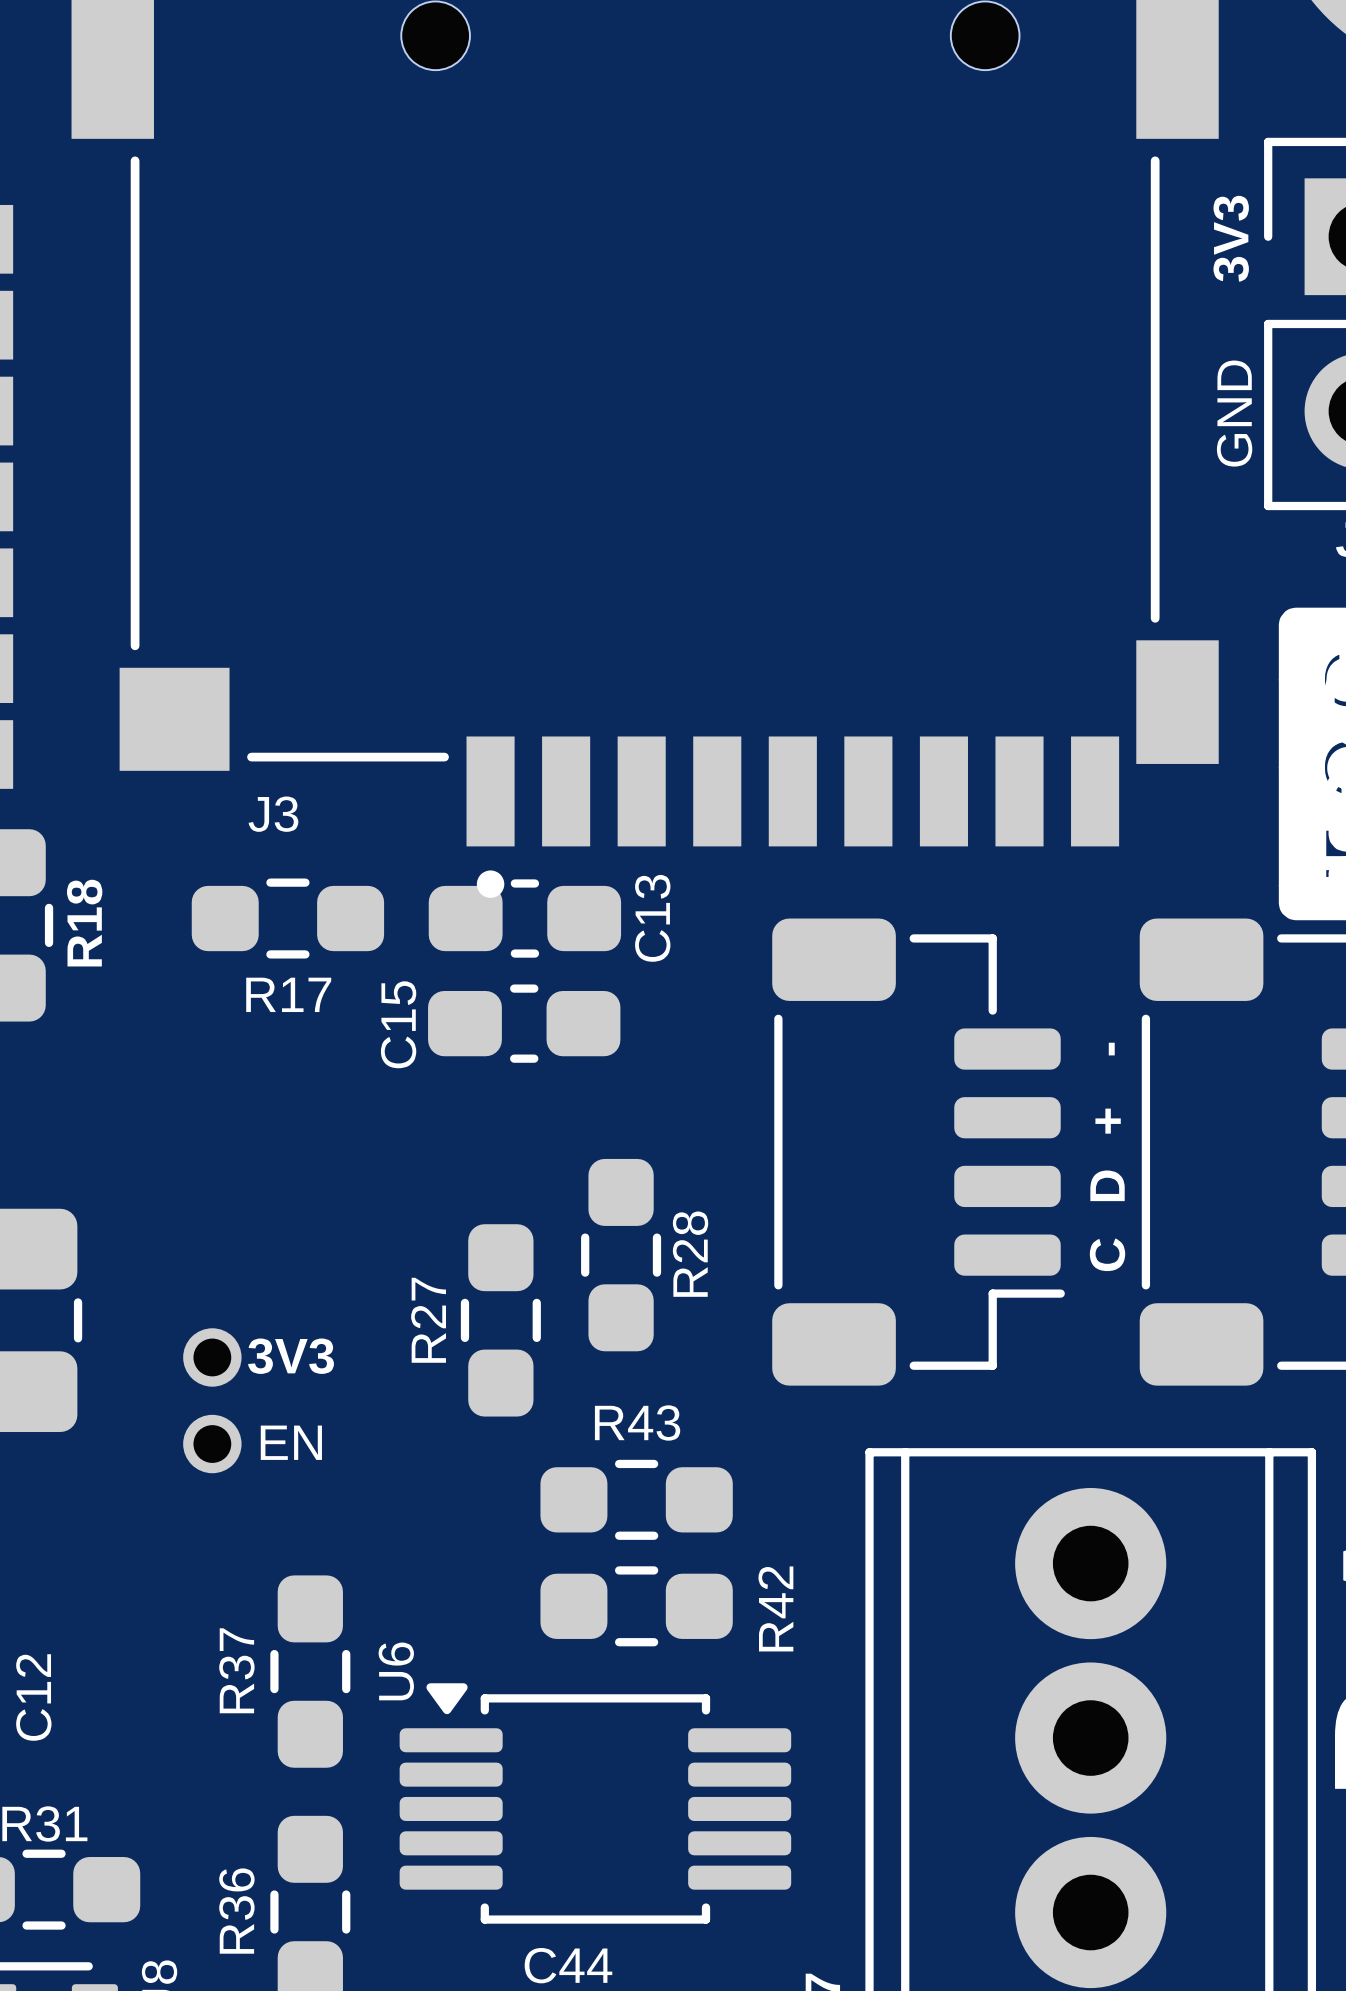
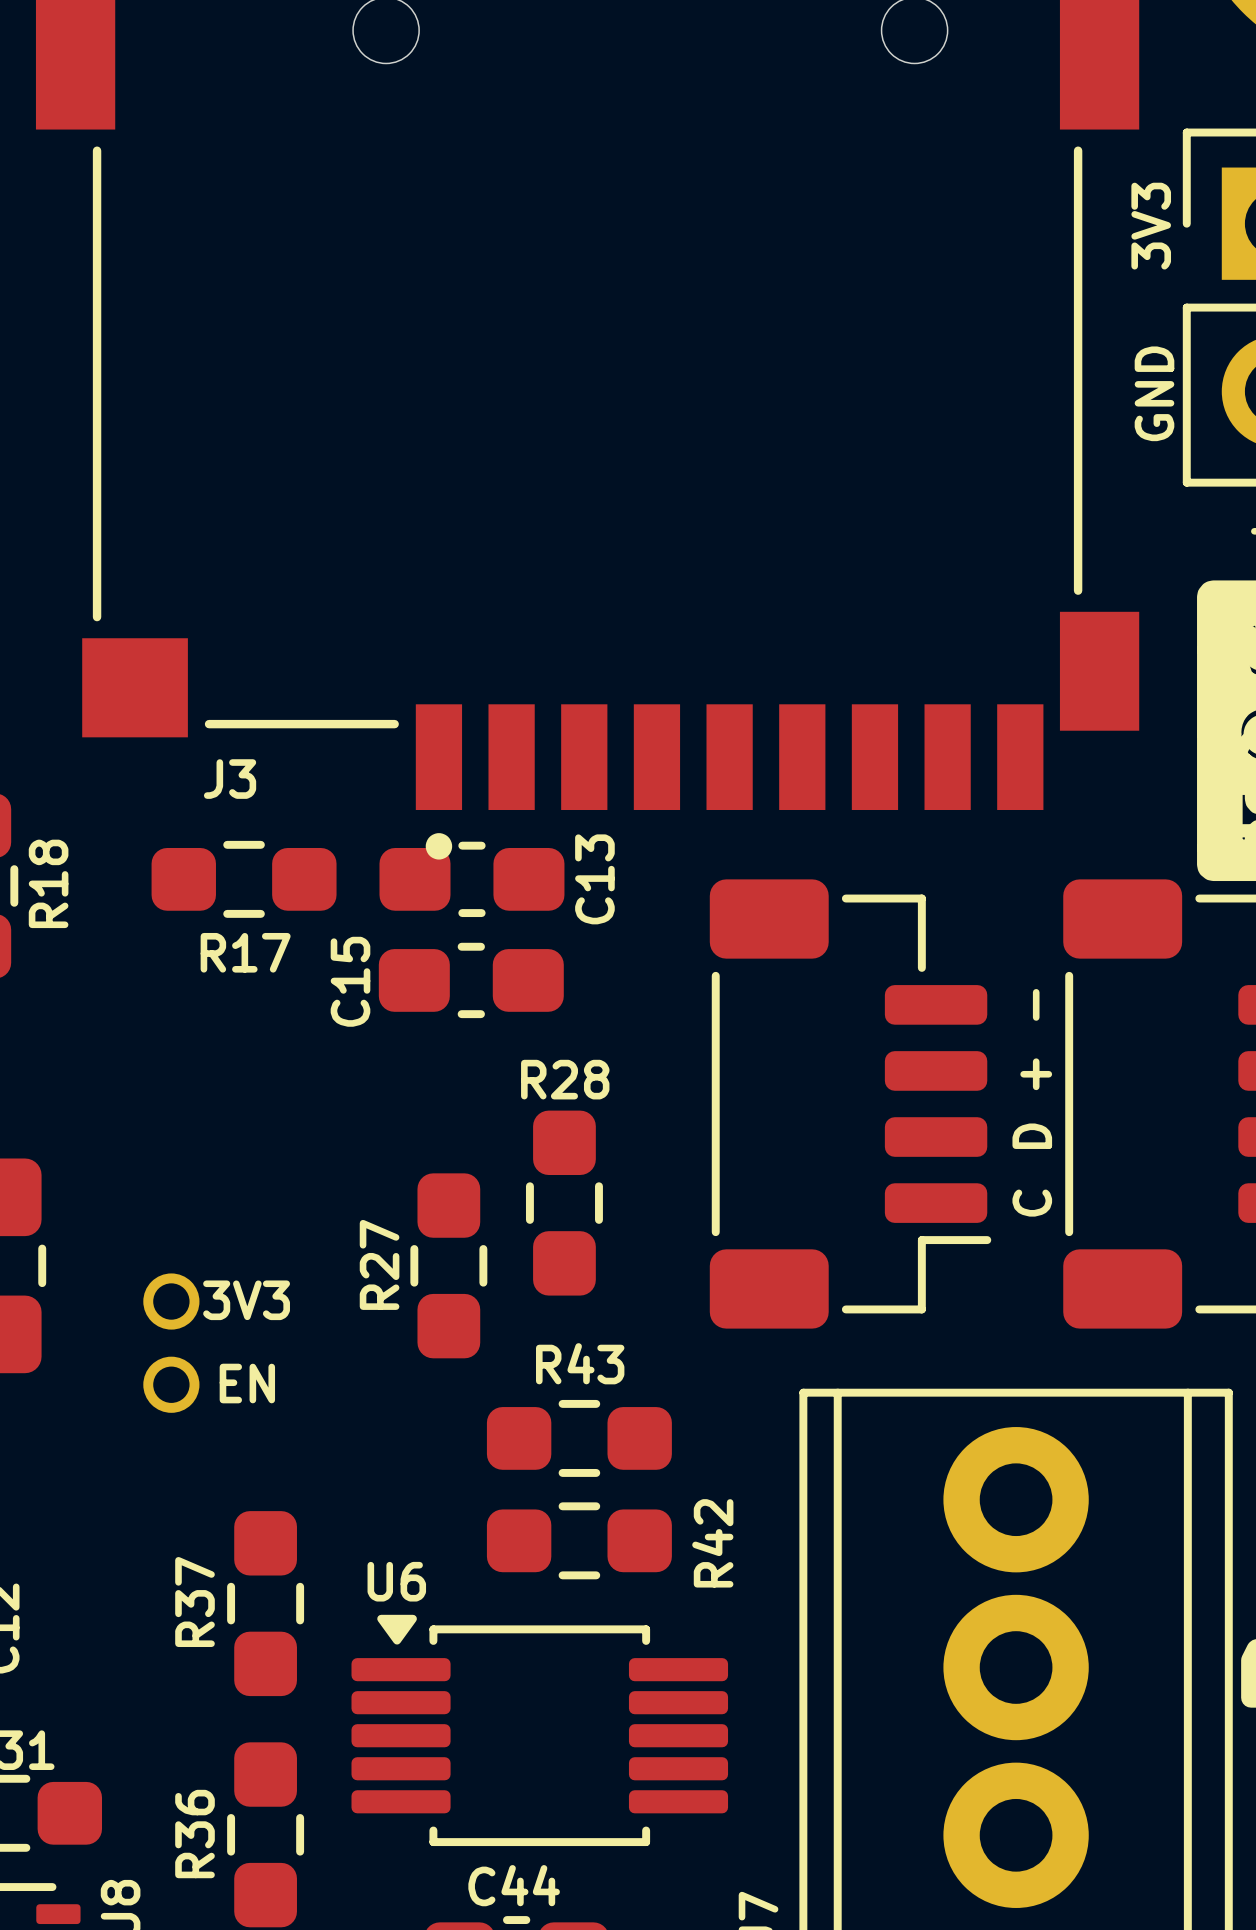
R28 name rotation: 0° (690, 1254) -> 90° clockwise (565, 1079)
R28 name position: R28 (690, 1254) -> R28 (565, 1079)
U6 name rotation: 0° (396, 1671) -> 90° clockwise (396, 1581)

